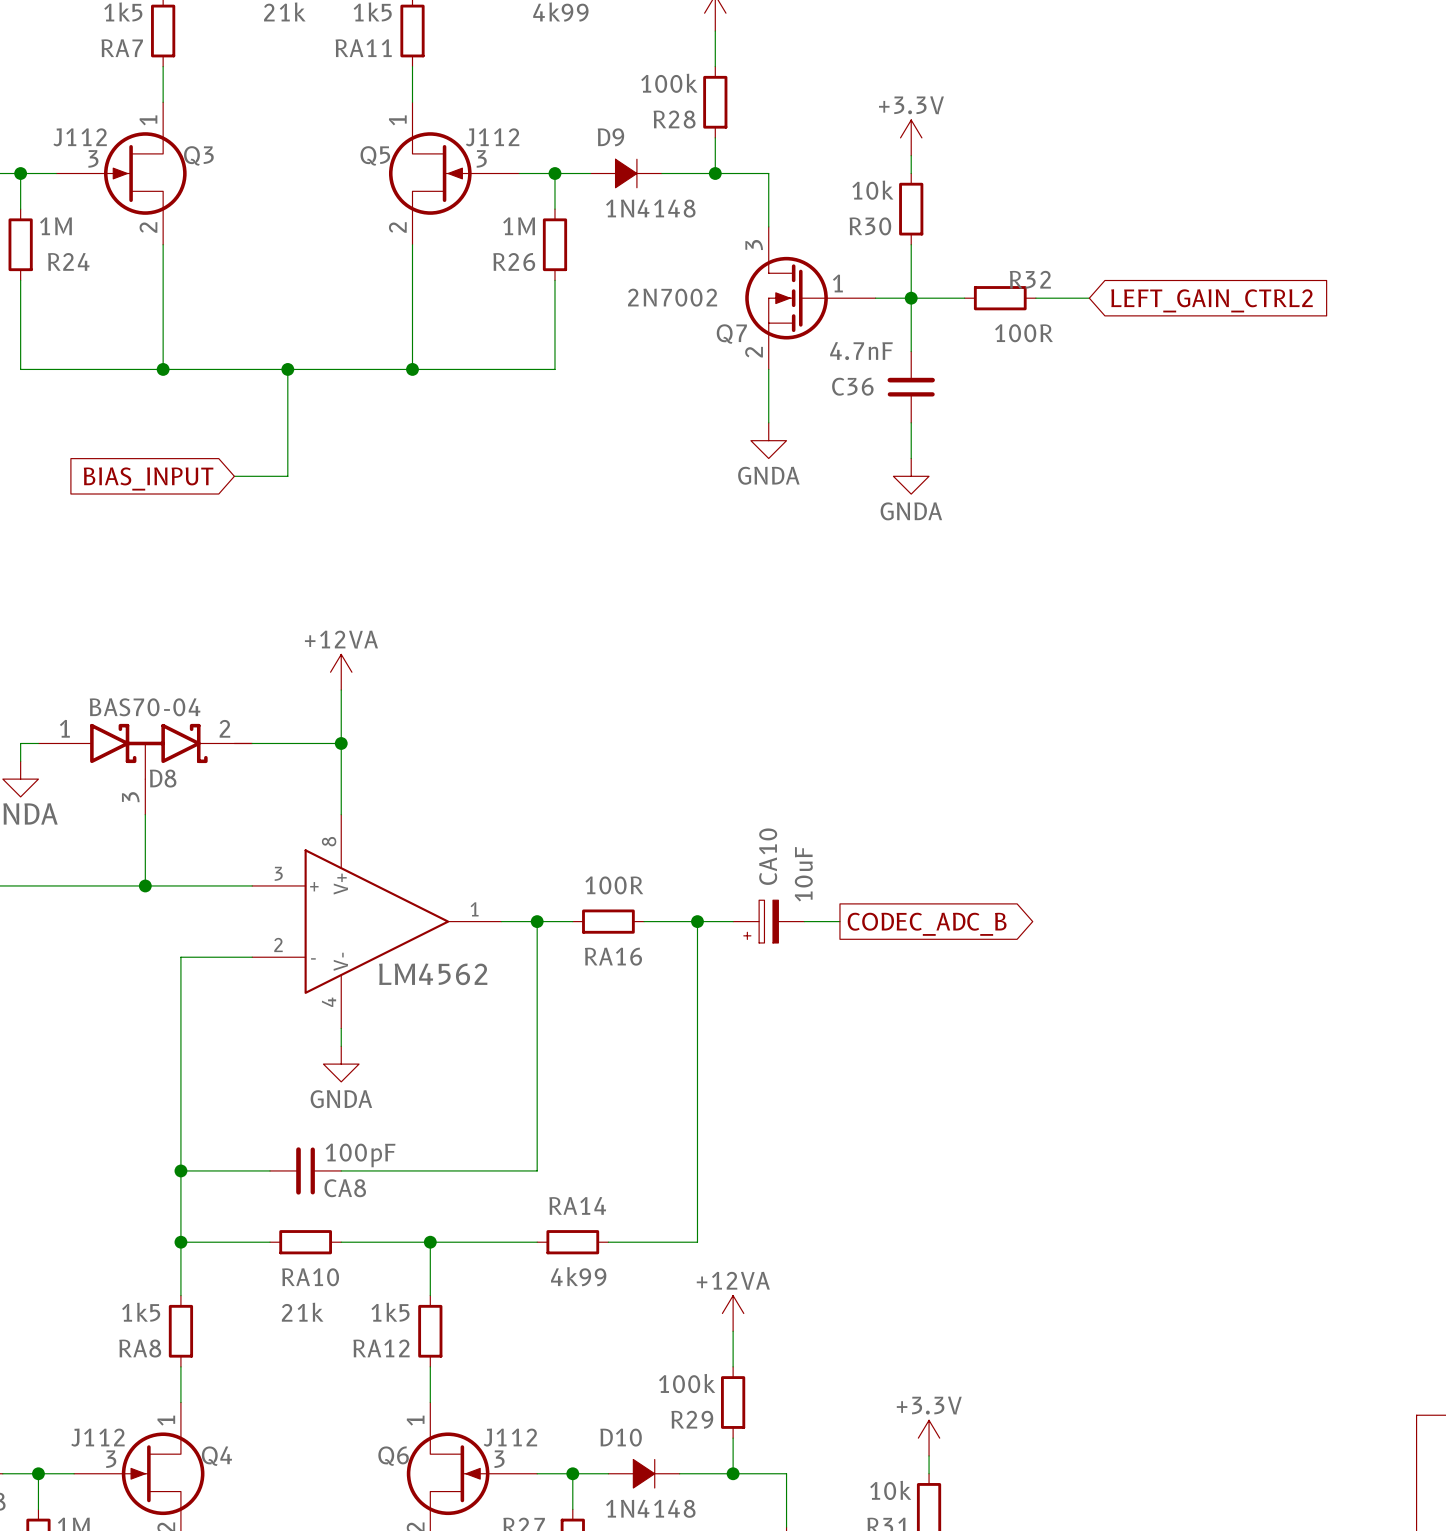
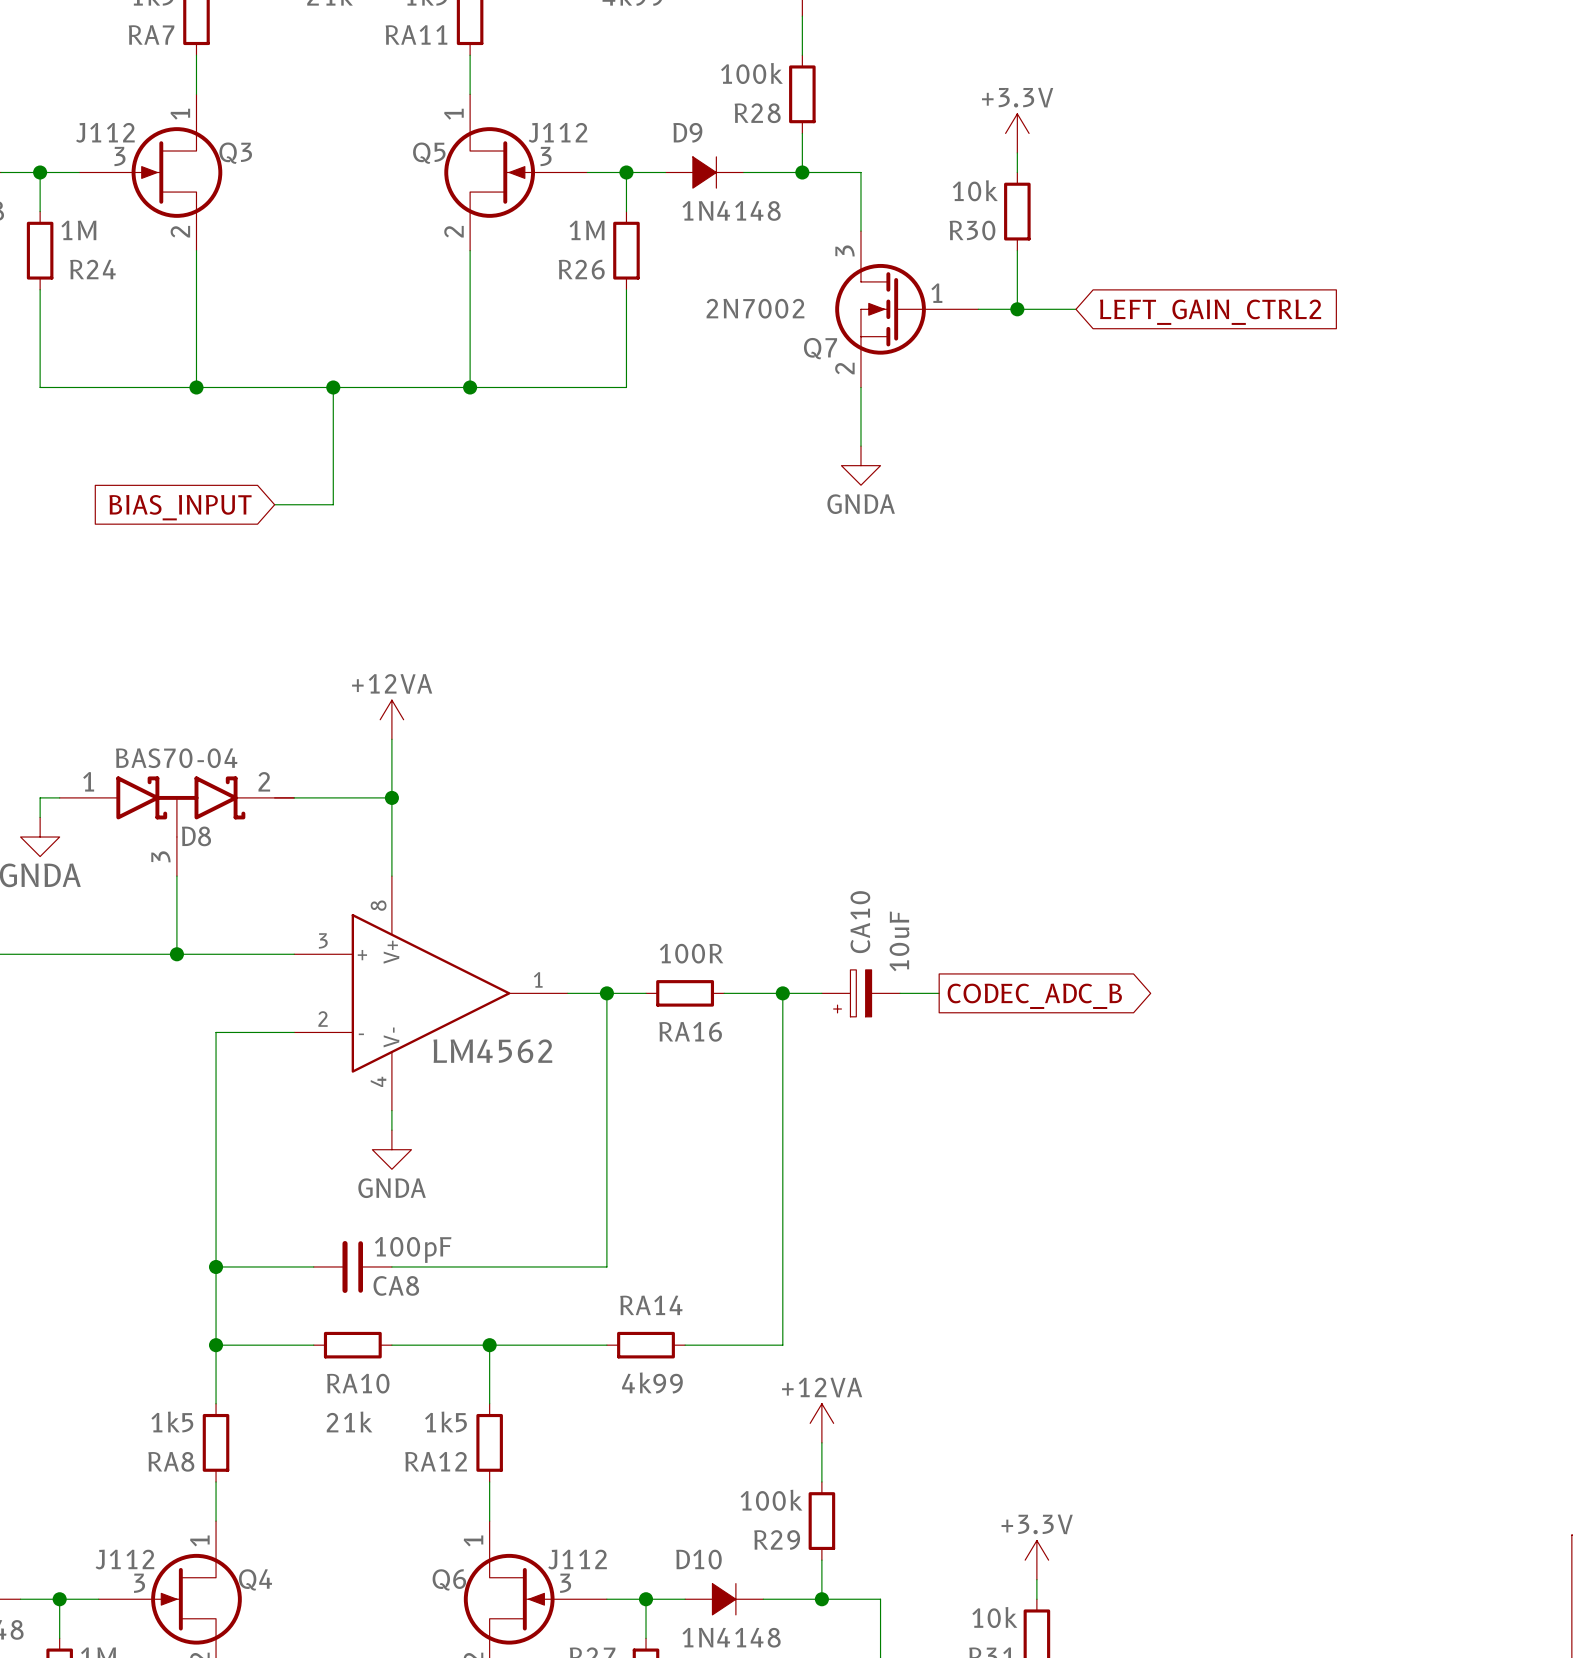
wire: (911, 298) (911, 351) -> none
R32: 100R (1000, 298) -> none
wire: (1035, 298) (1089, 298) -> none
global label position: LEFT_GAIN_CTRL2 (1212, 300) -> LEFT_GAIN_CTRL2 (1210, 312)
C36: 4.7nF (911, 387) -> none
wire: (911, 422) (911, 458) -> none
power symbol: GNDA (911, 476) -> none

